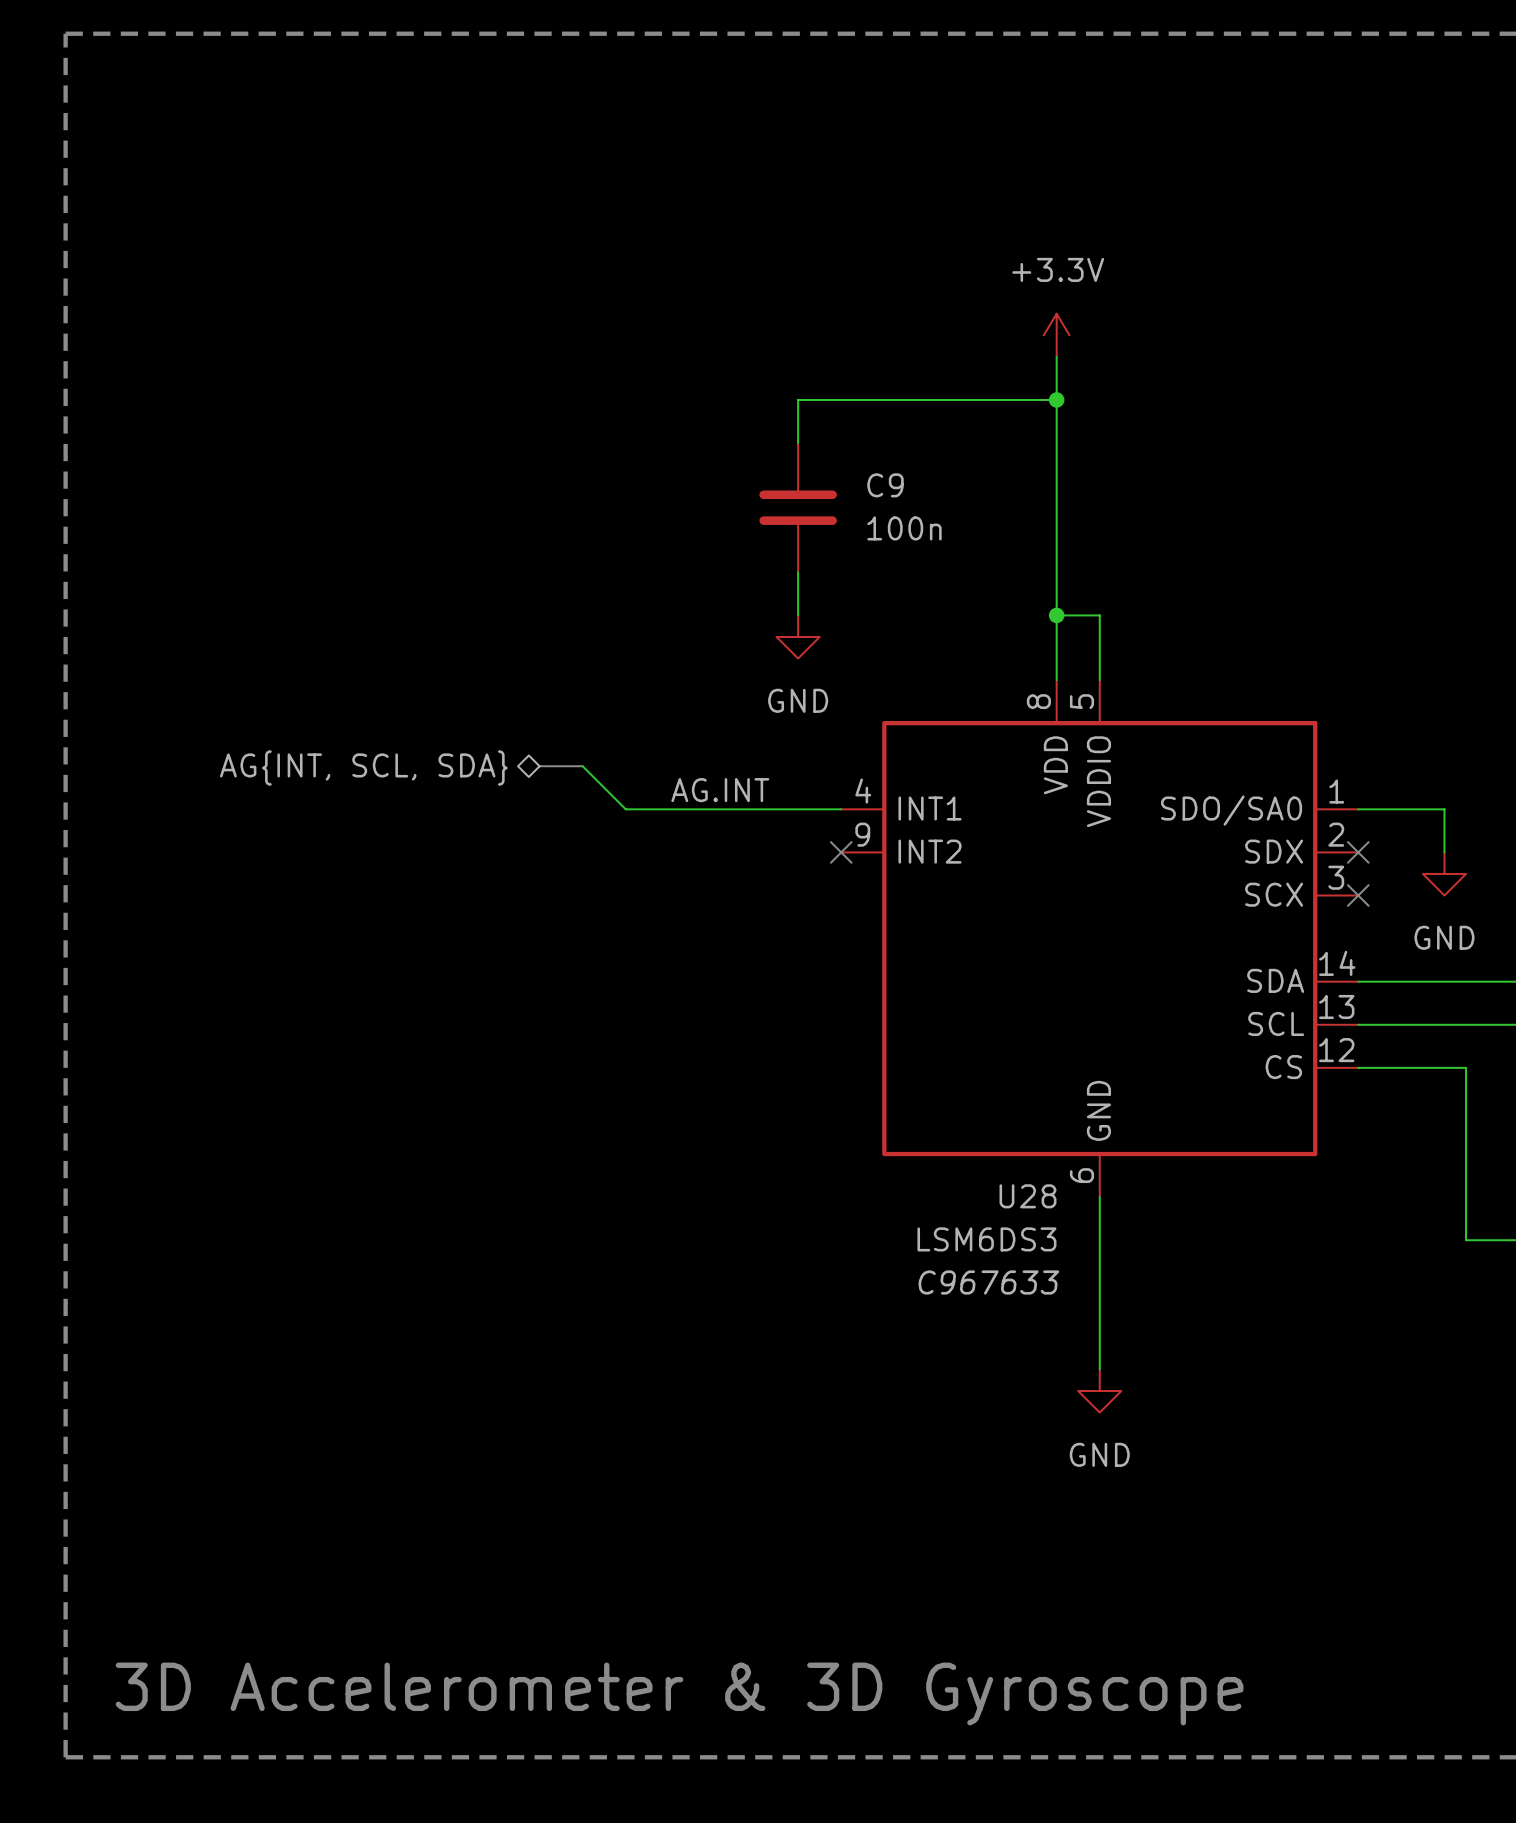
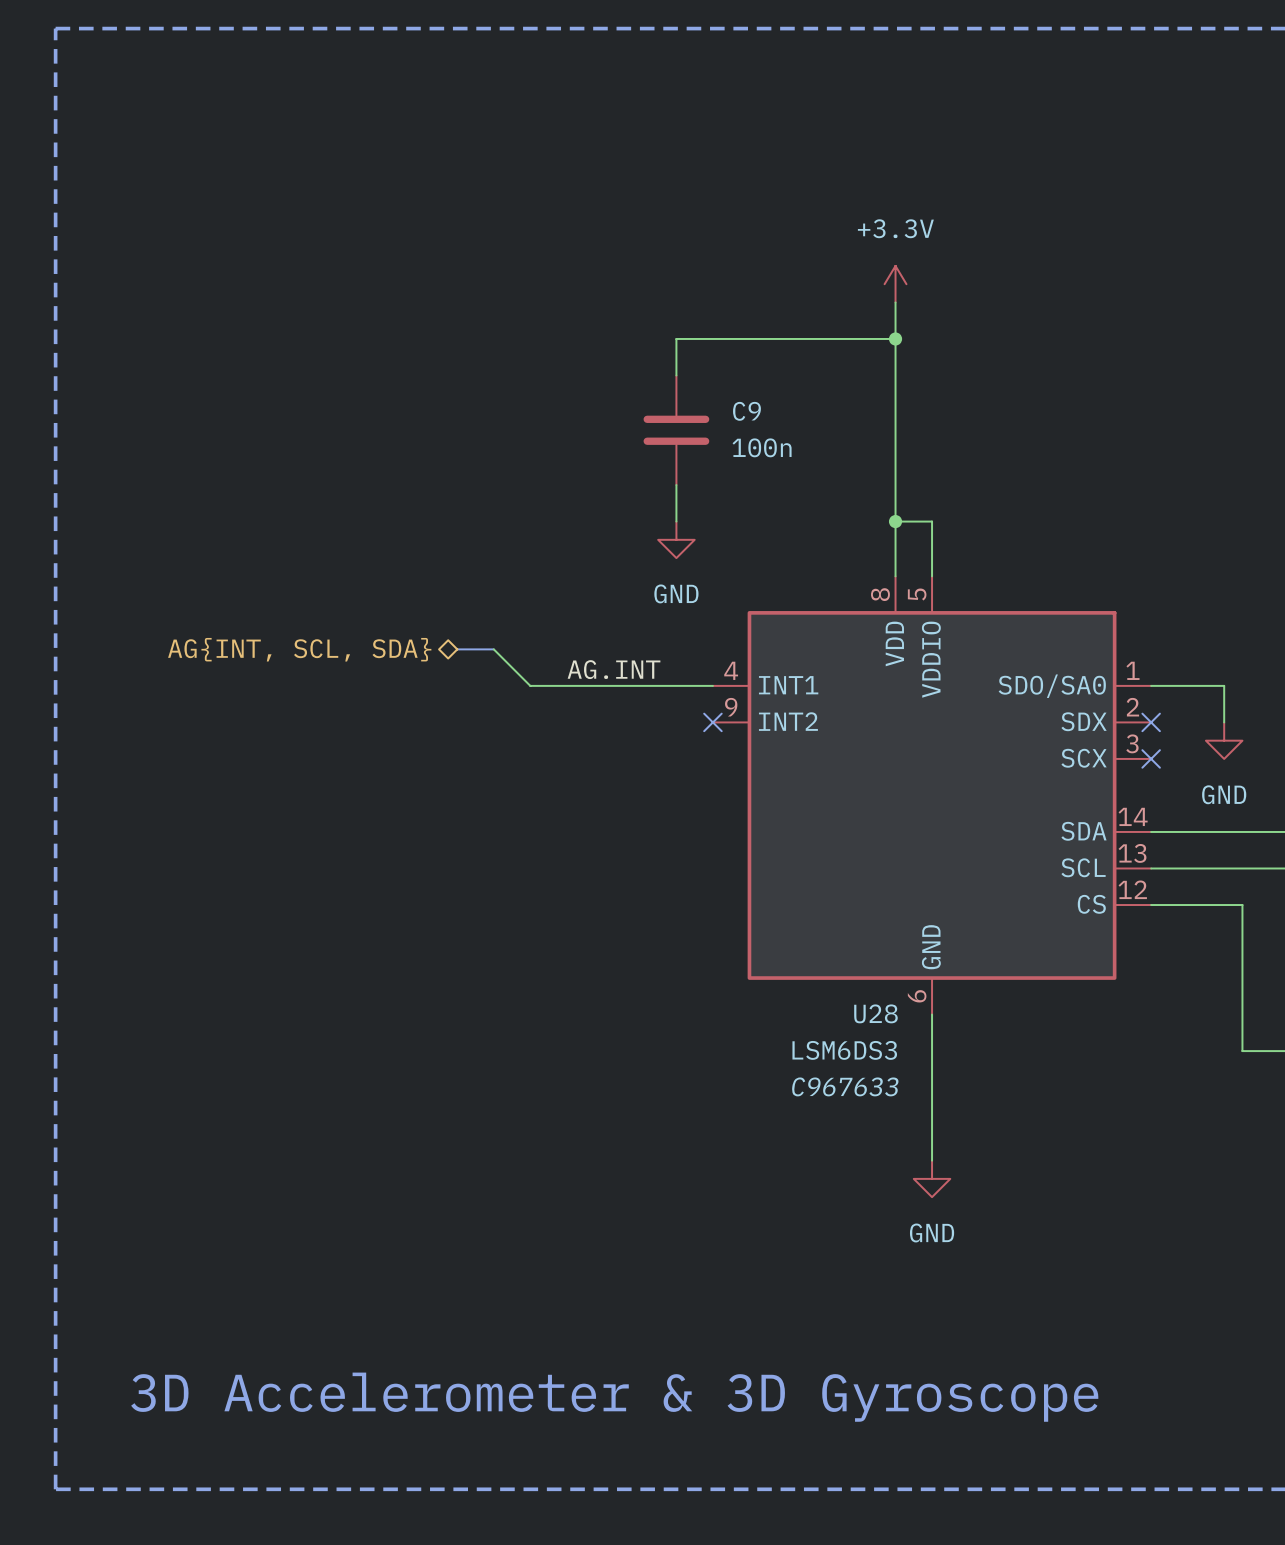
text position: 3D Accelerometer & 3D Gyroscope (679, 1693) -> 3D Accelerometer & 3D Gyroscope (614, 1397)

